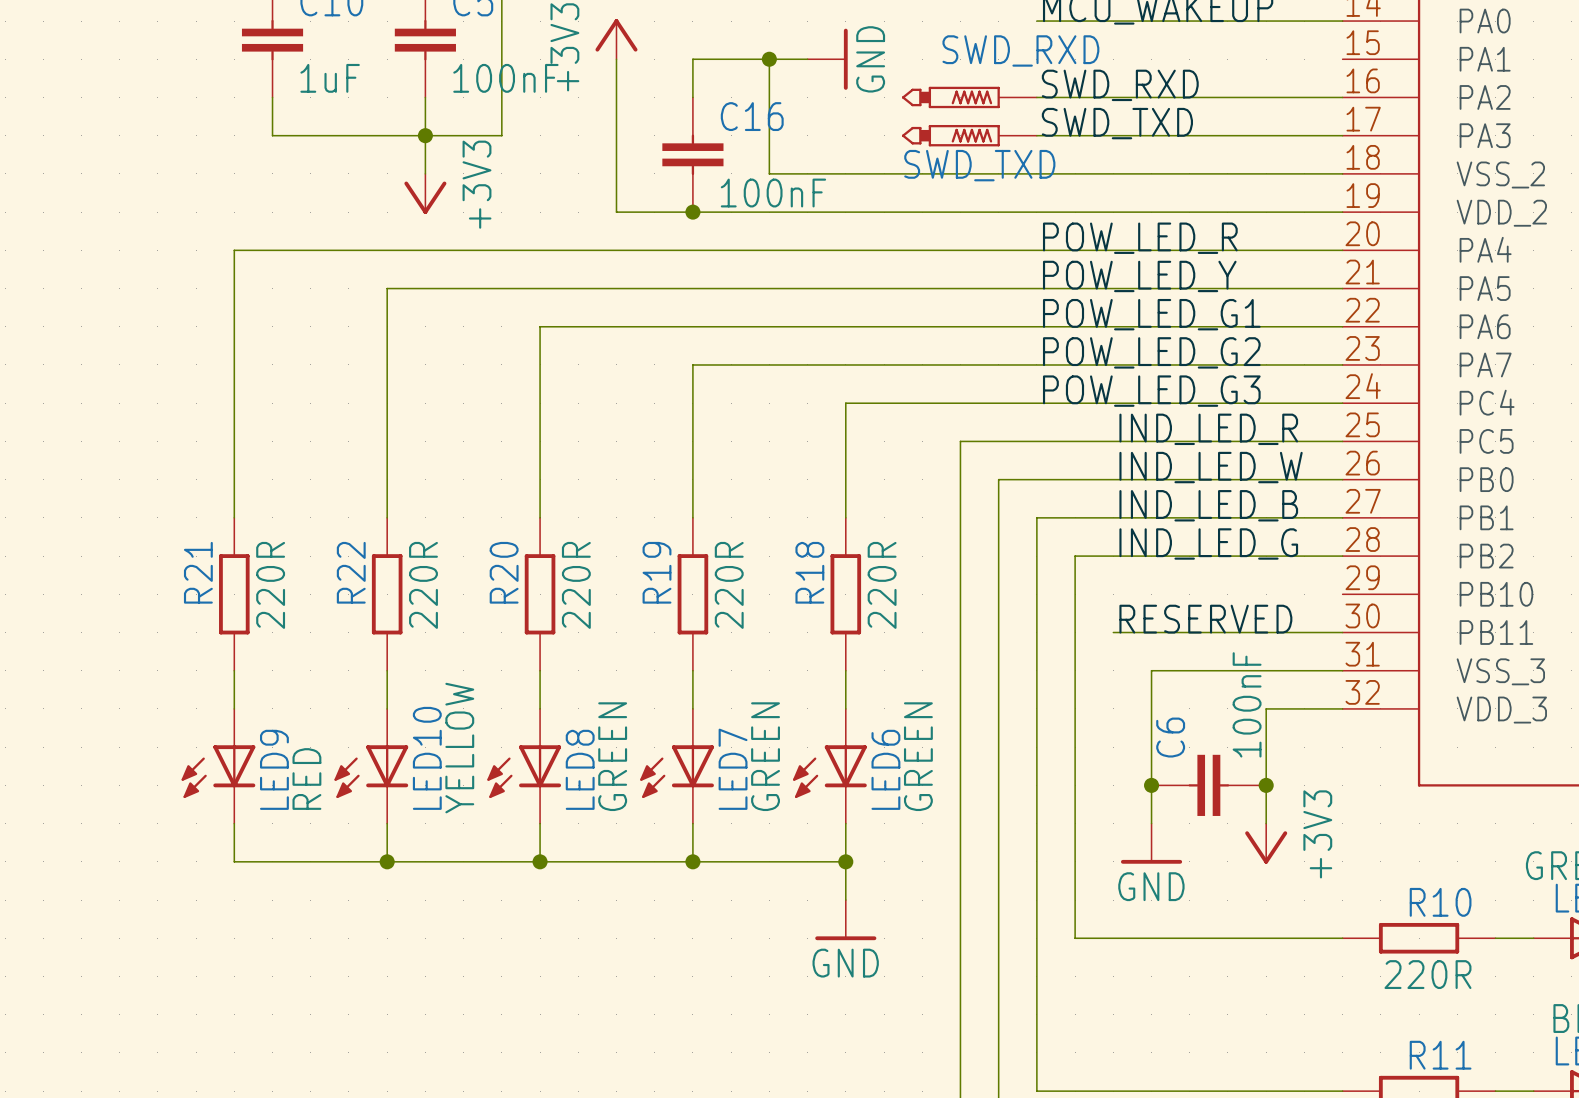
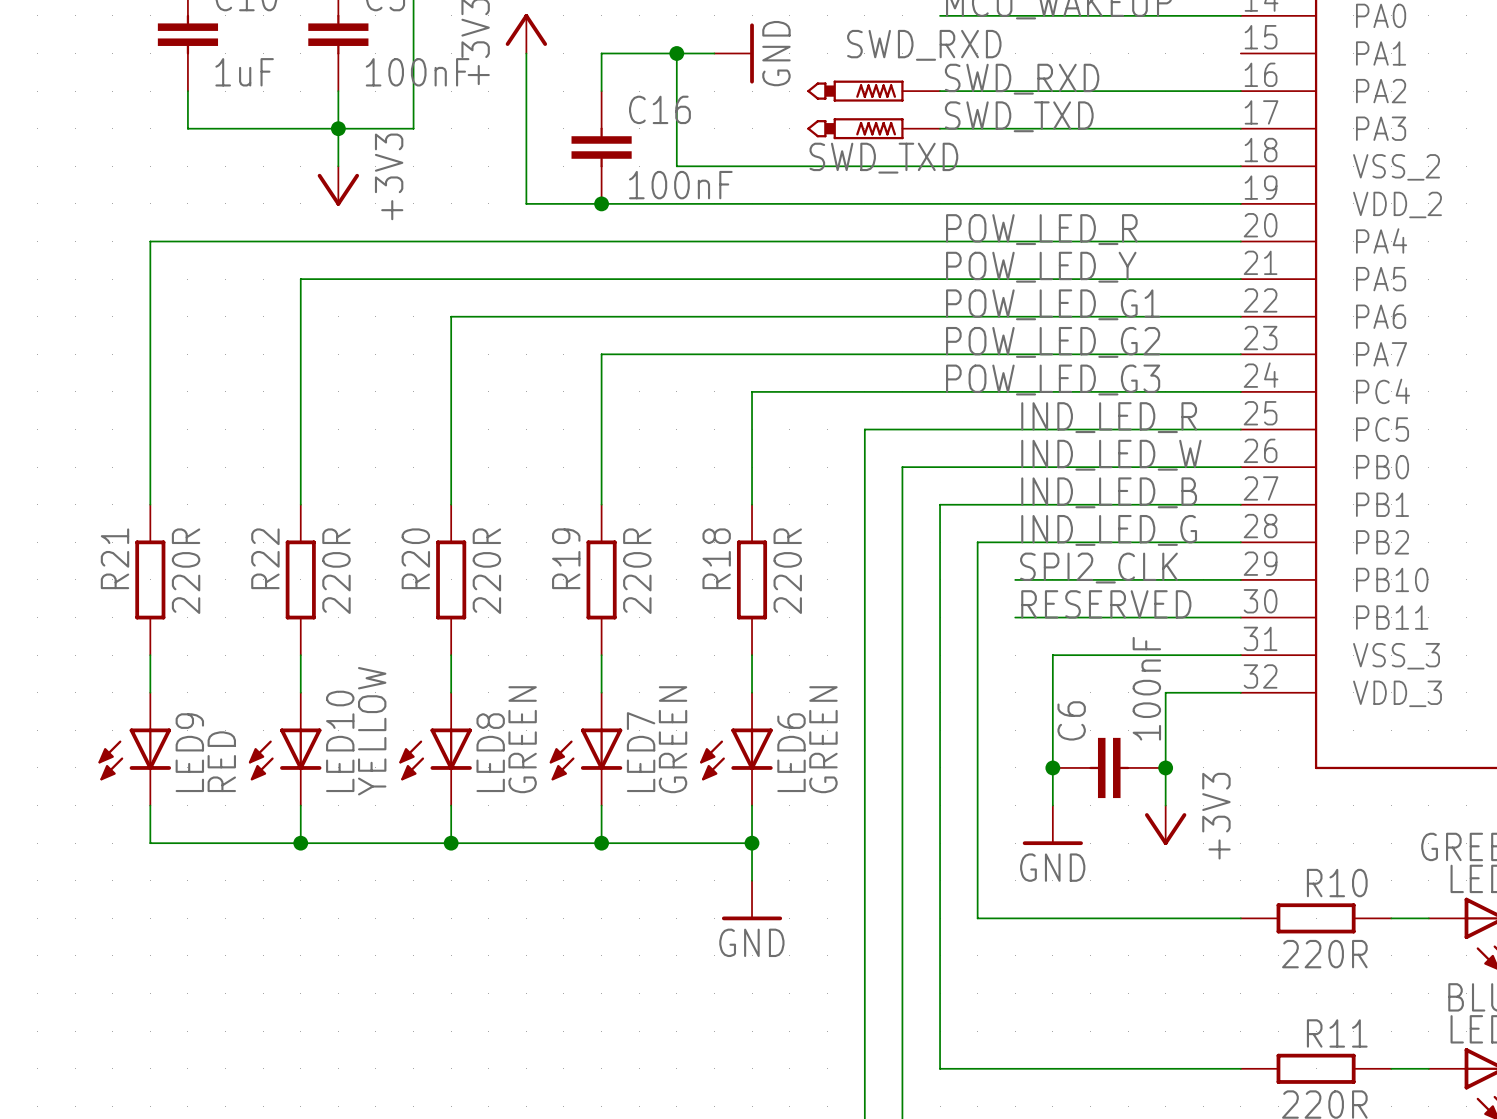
label: none -> SPI2_CLK (1098, 568)
wire: none -> (1015, 579) (1240, 579)

